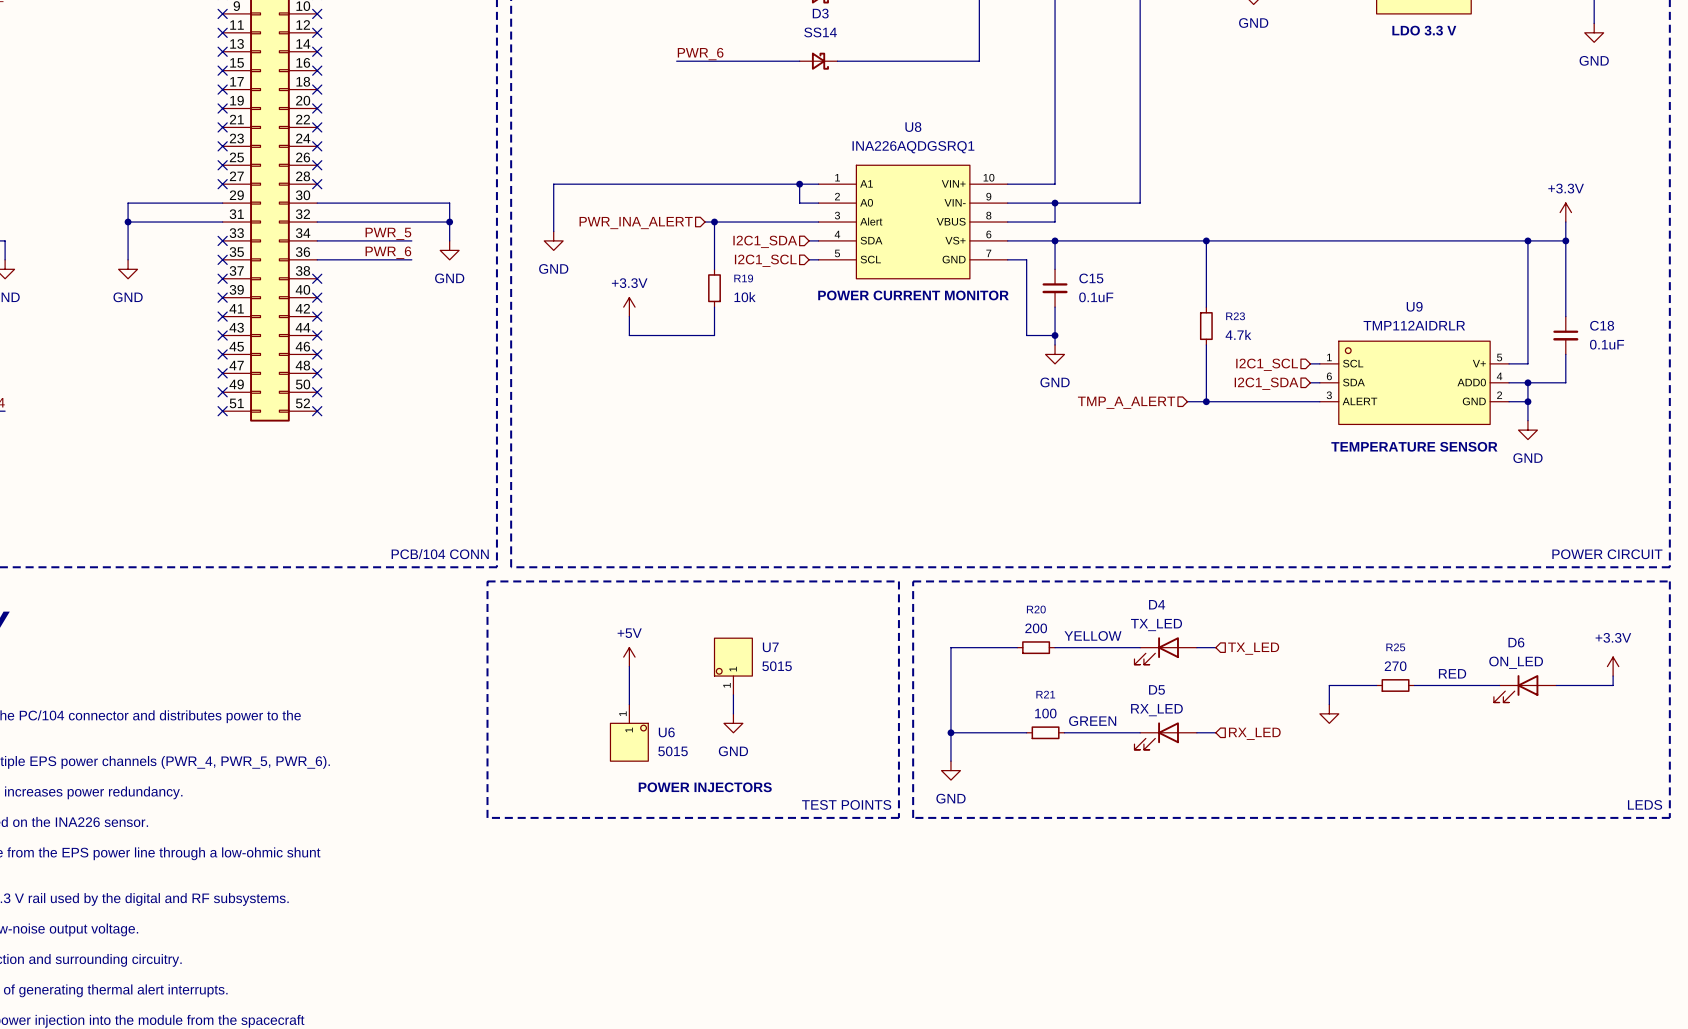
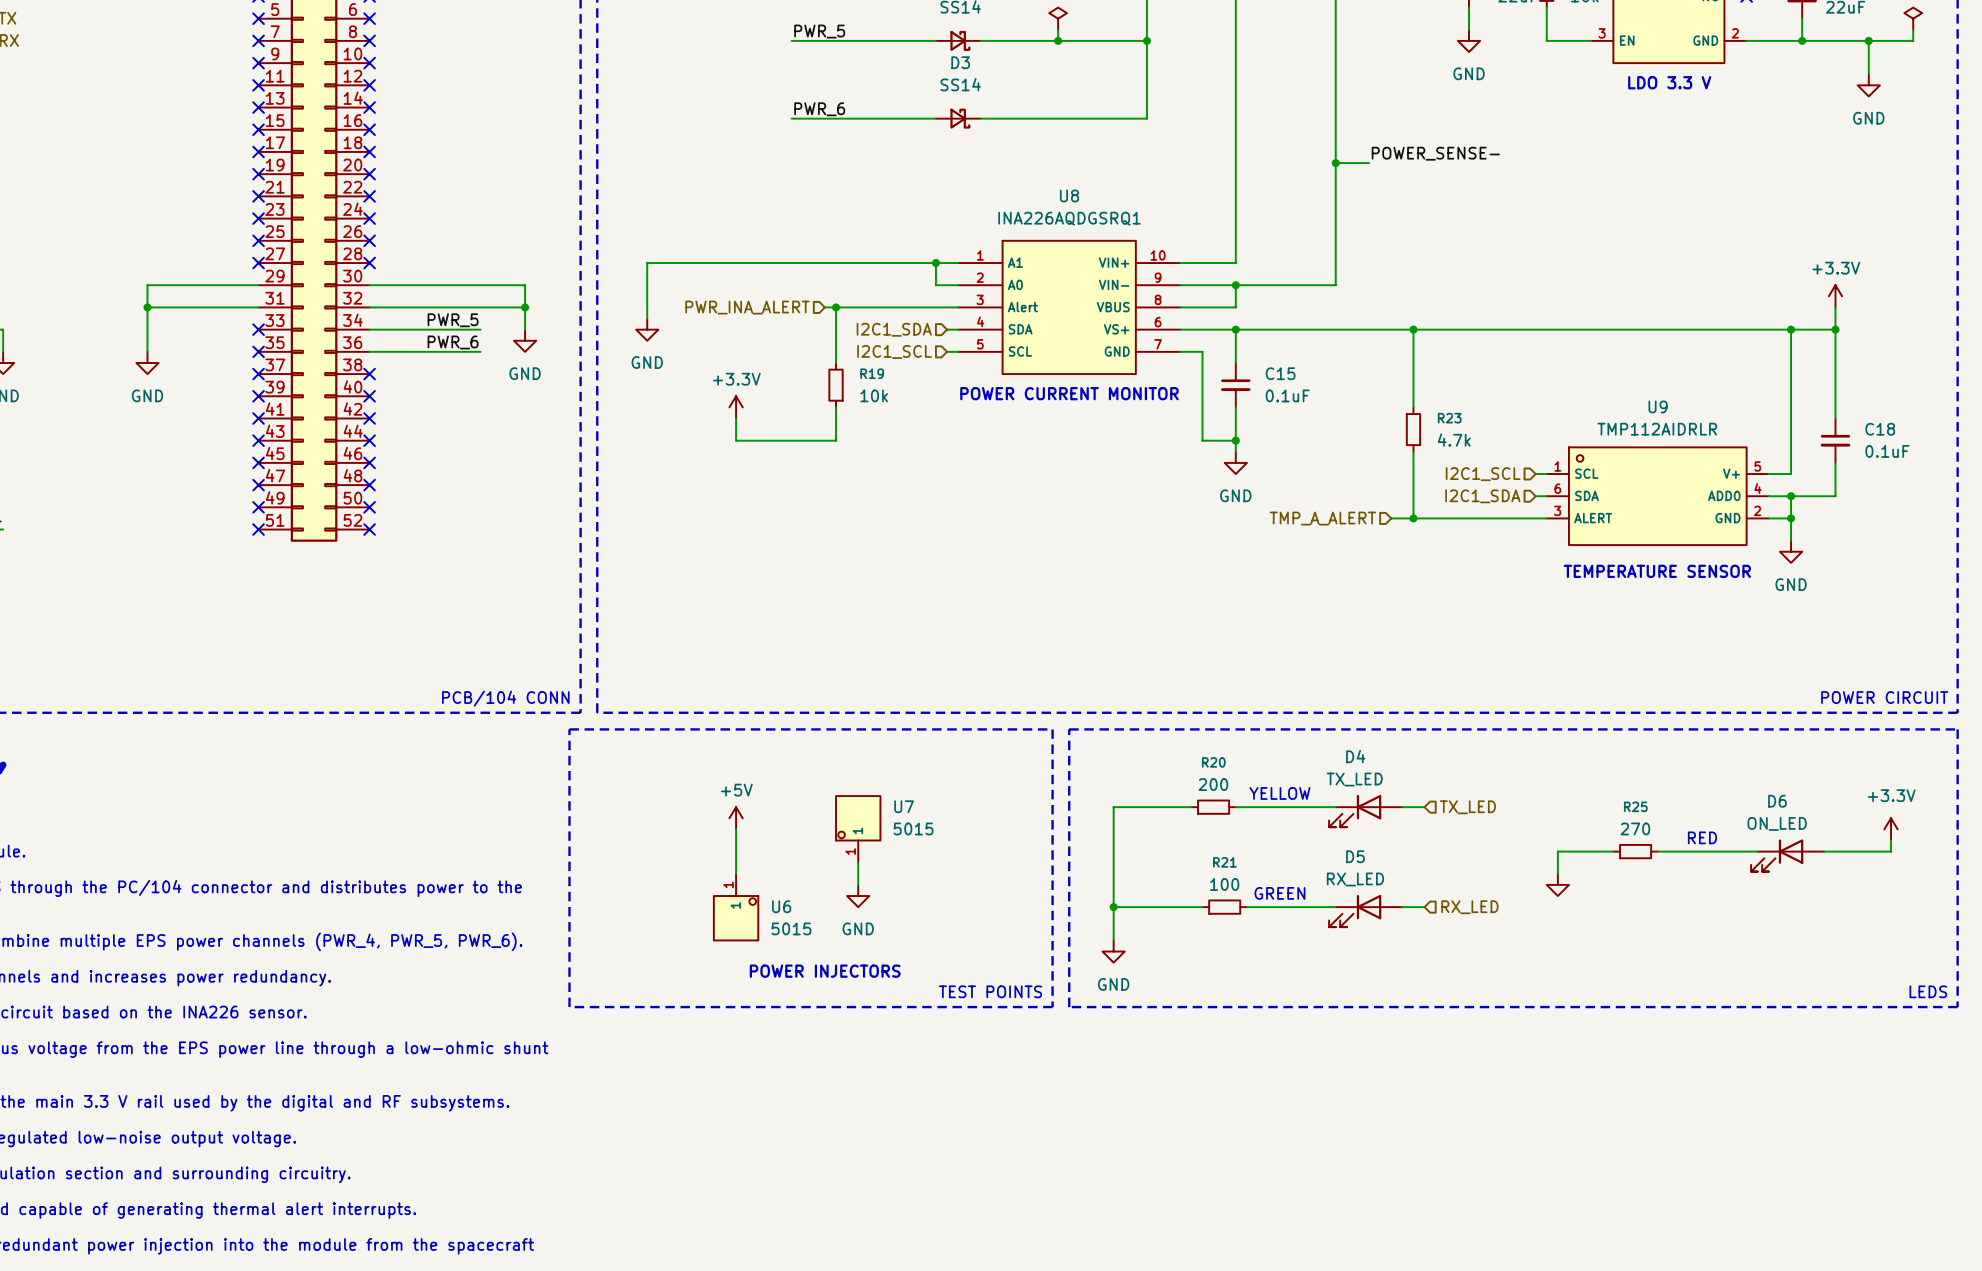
label: none -> POWER_SENSE- (1435, 153)
wire: none -> (1335, 163) (1369, 163)
junction: none -> (1335, 163)

